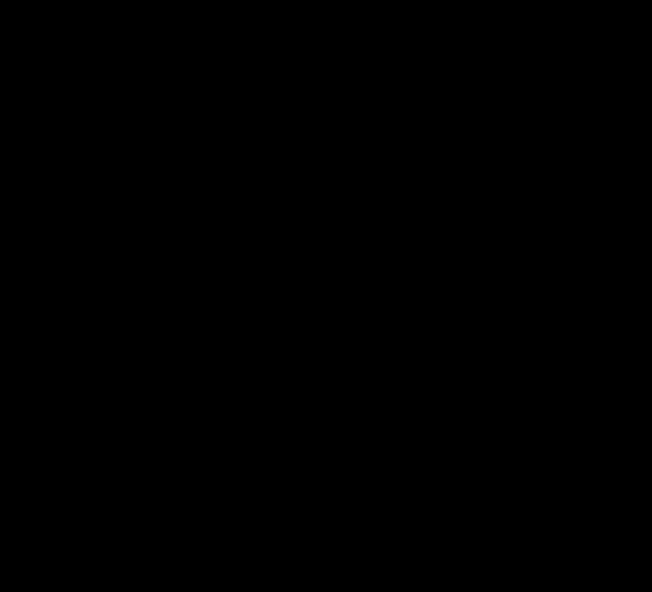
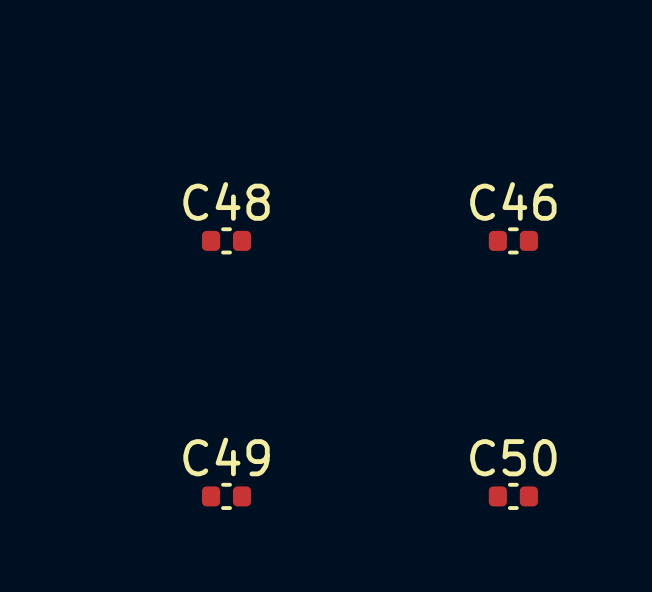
C48: none -> (226, 240)
C46: none -> (513, 240)
C49: none -> (226, 496)
C50: none -> (513, 496)

